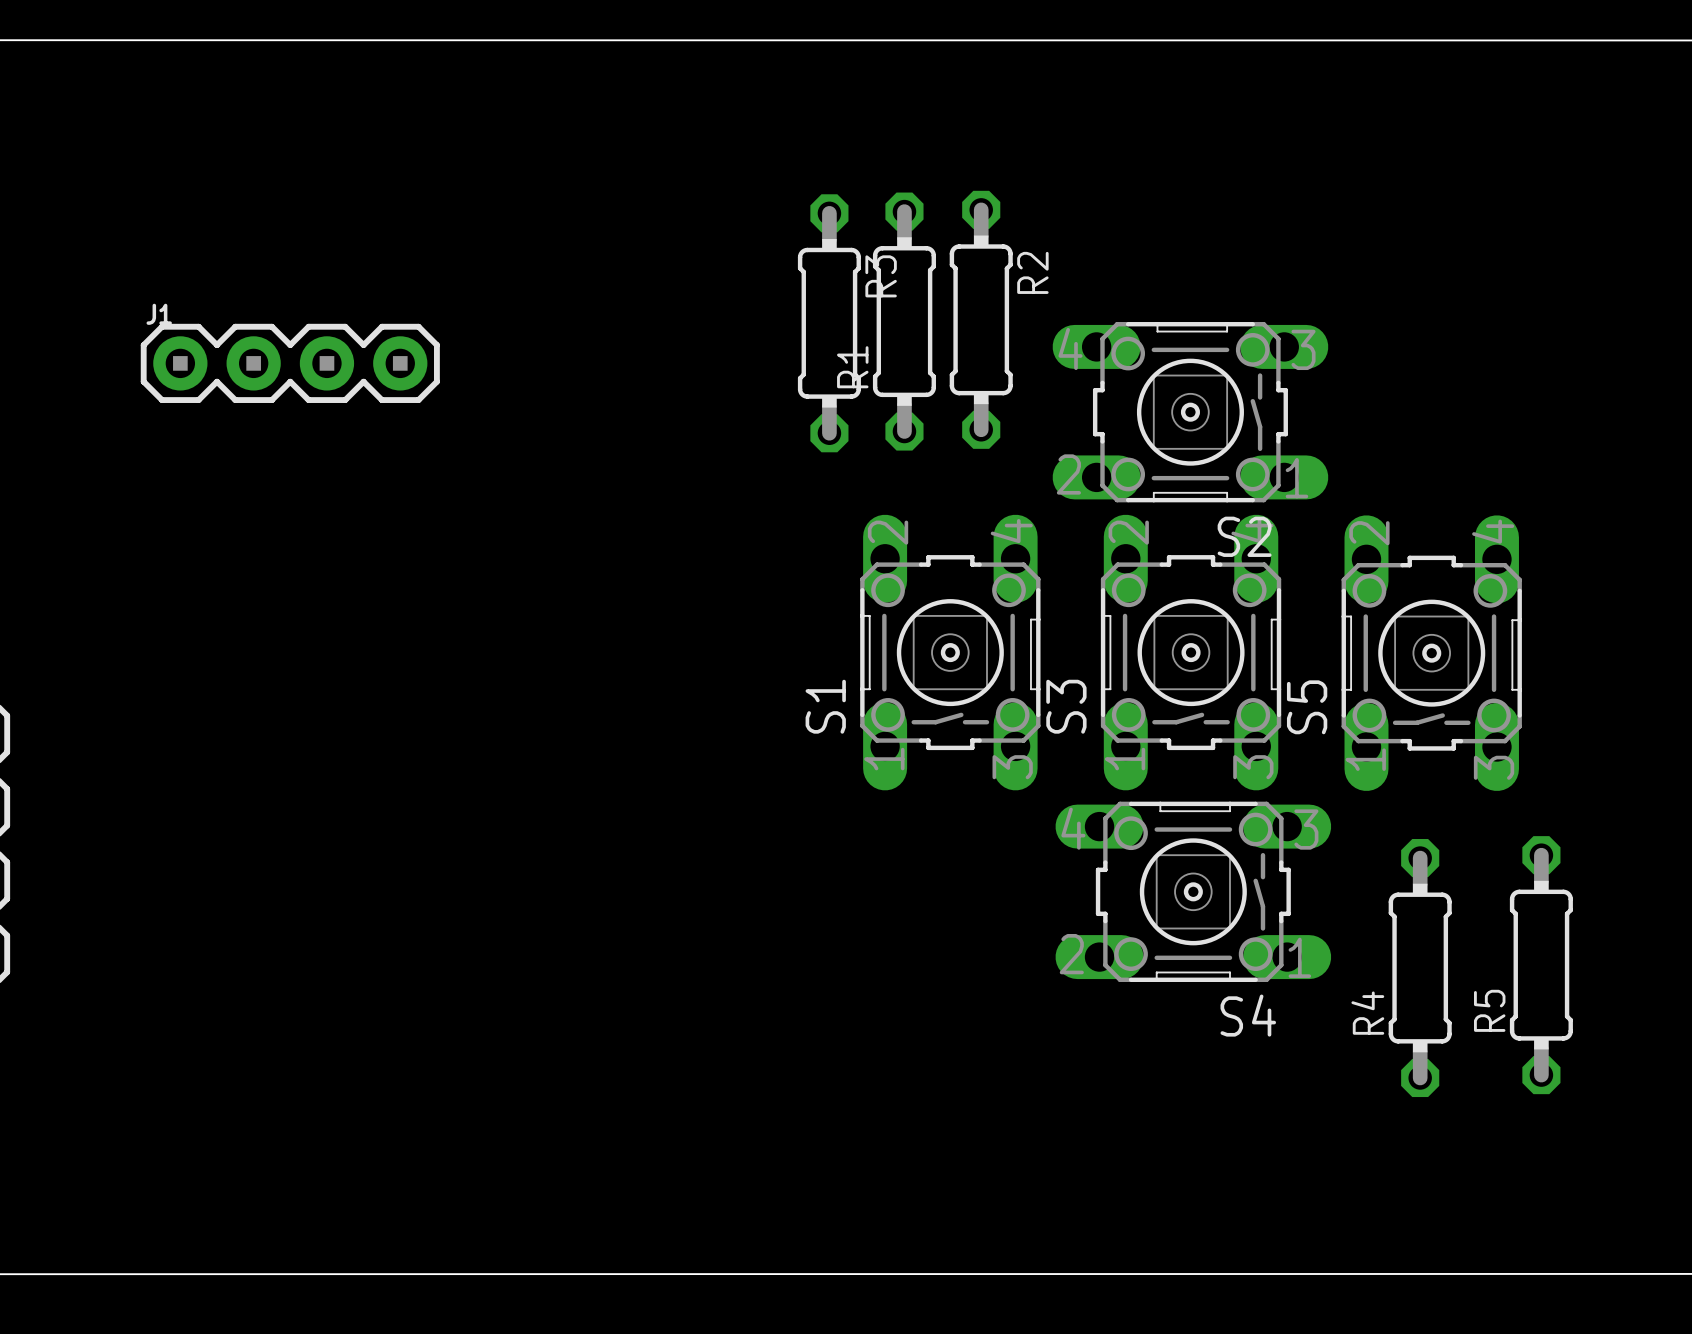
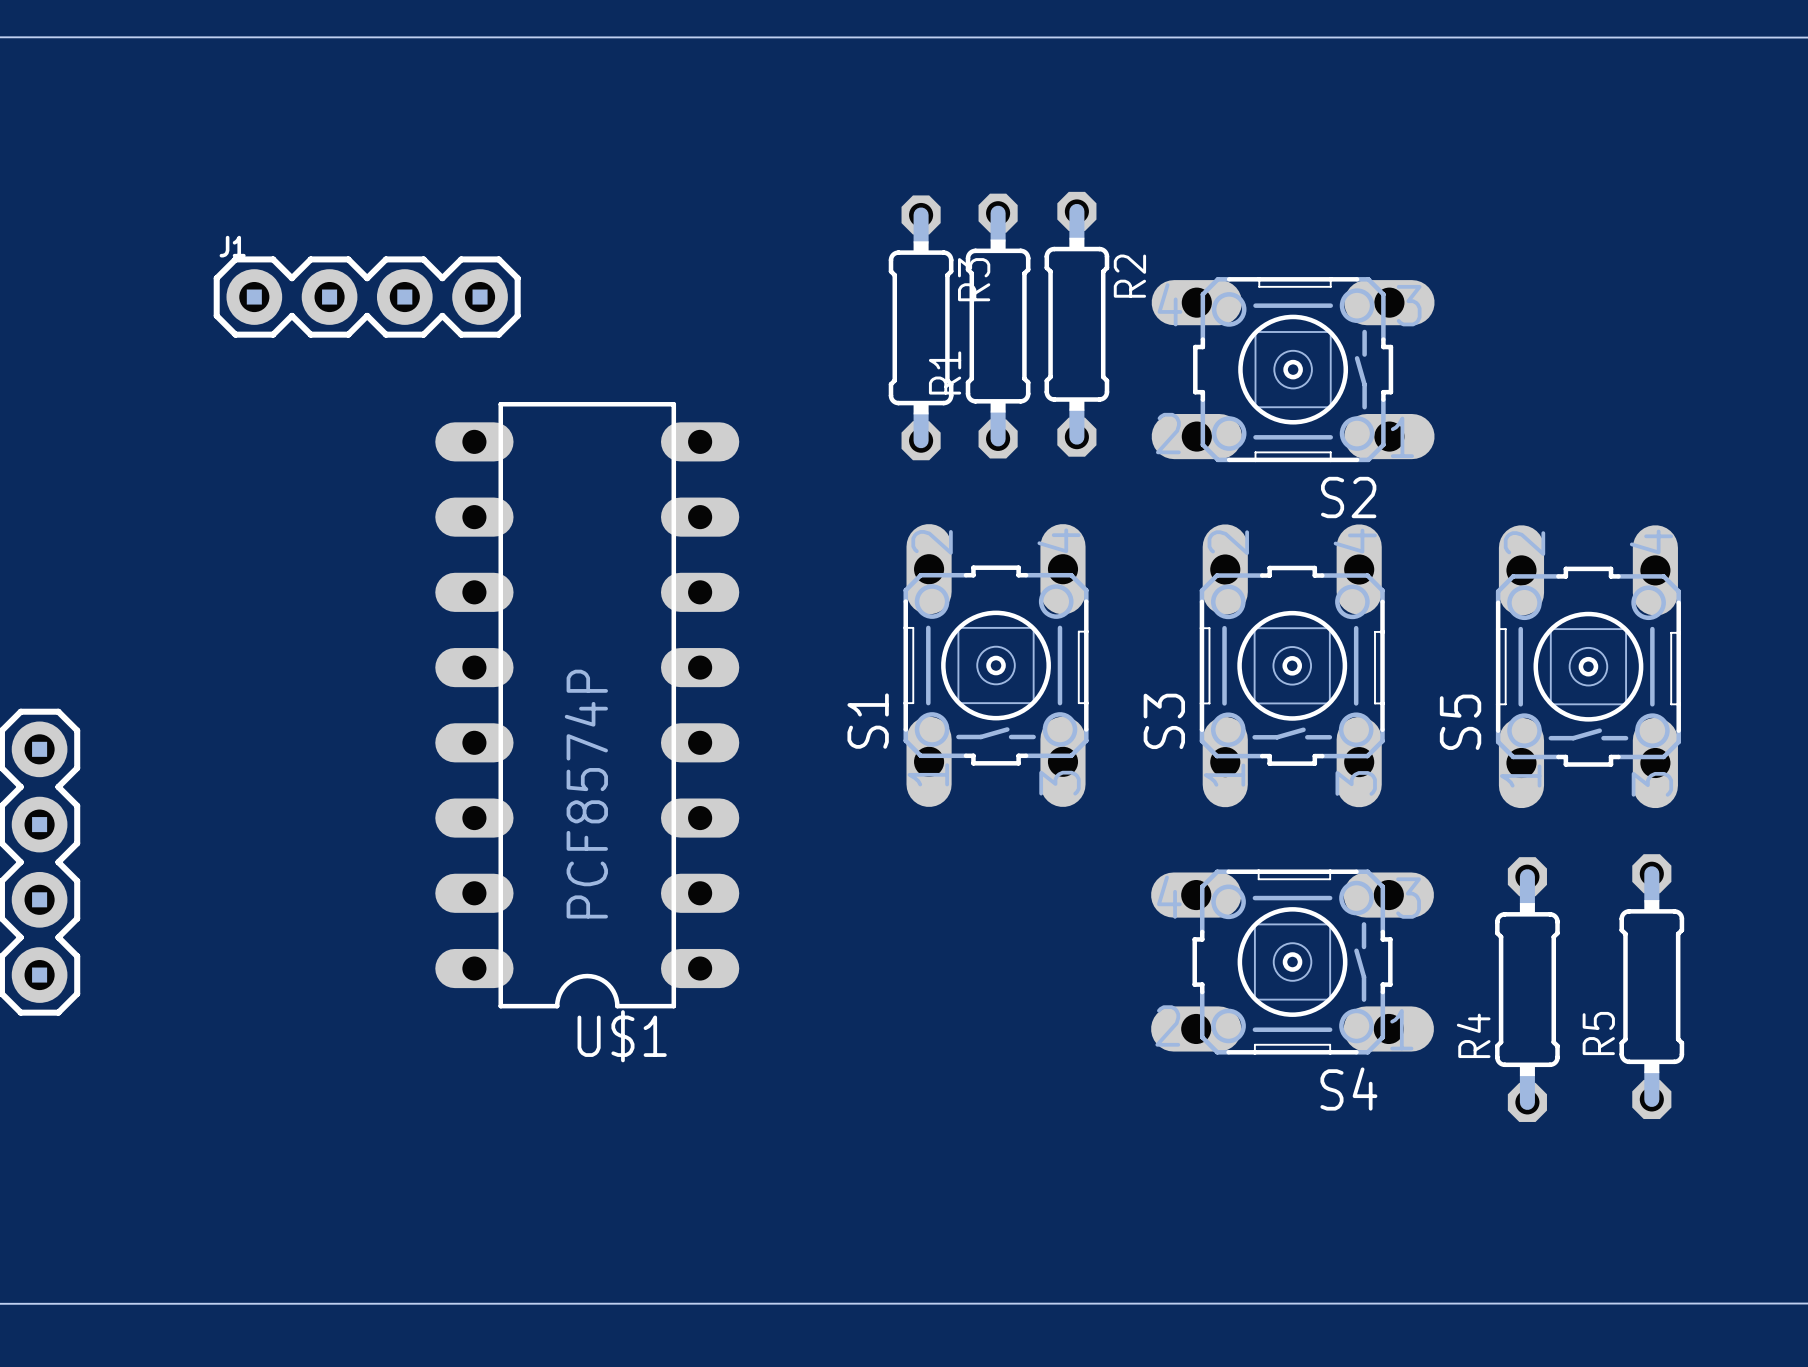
J1 position: (290, 363) -> (367, 297)
S2 position: (1190, 412) -> (1293, 369)
S1 position: (950, 652) -> (996, 665)
S5 position: (1431, 653) -> (1588, 666)
U$1: none -> PCF8574P (587, 705)
S4 position: (1193, 891) -> (1292, 962)

